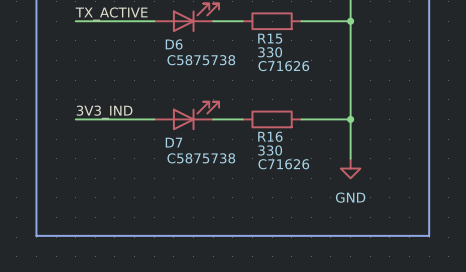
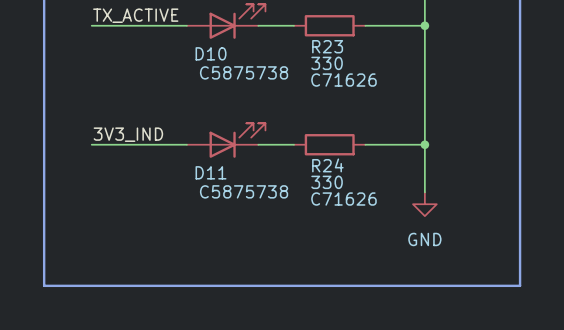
R15 name: R15 (270, 38) -> R23 (327, 46)
D6 name: D6 (174, 44) -> D10 (211, 53)
R16 name: R16 (270, 136) -> R24 (327, 165)
D7 name: D7 (173, 142) -> D11 (211, 172)

